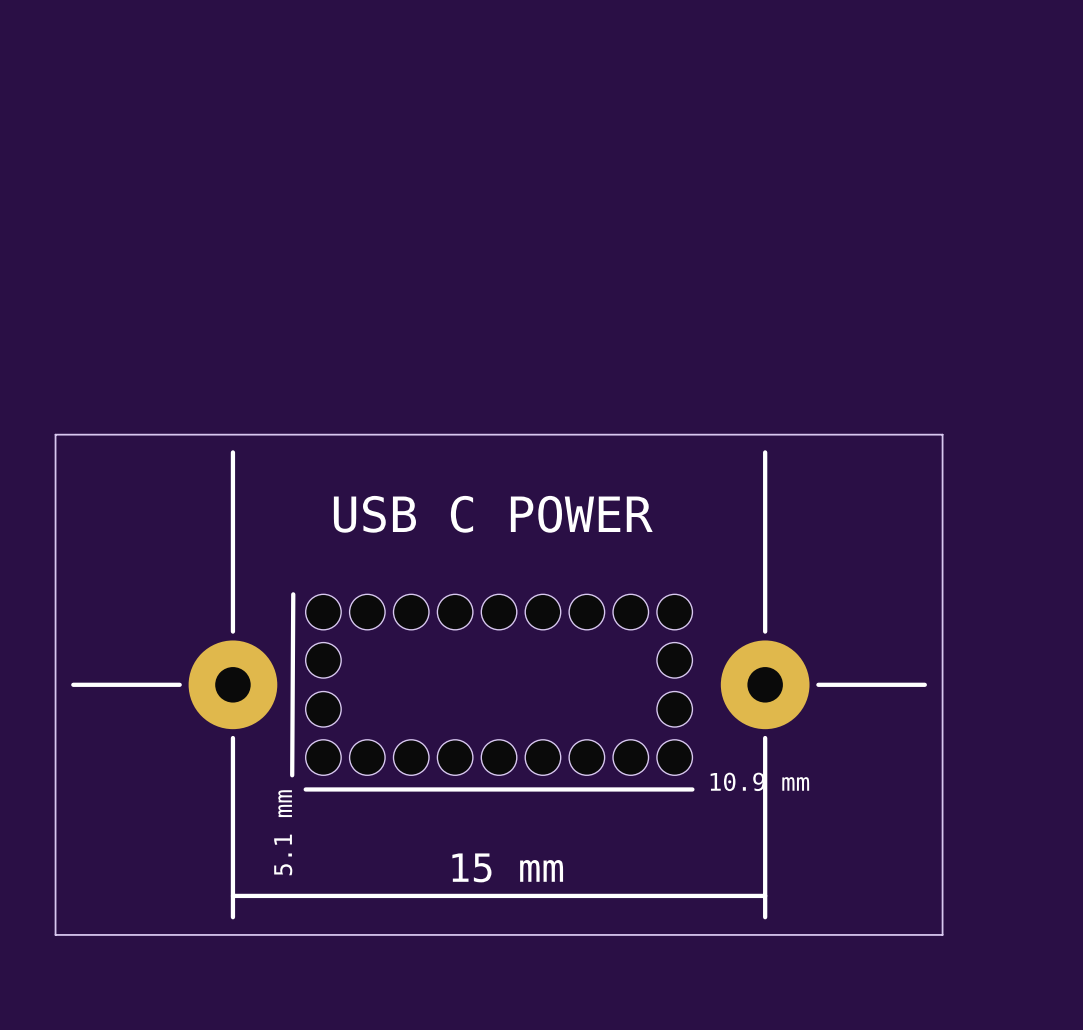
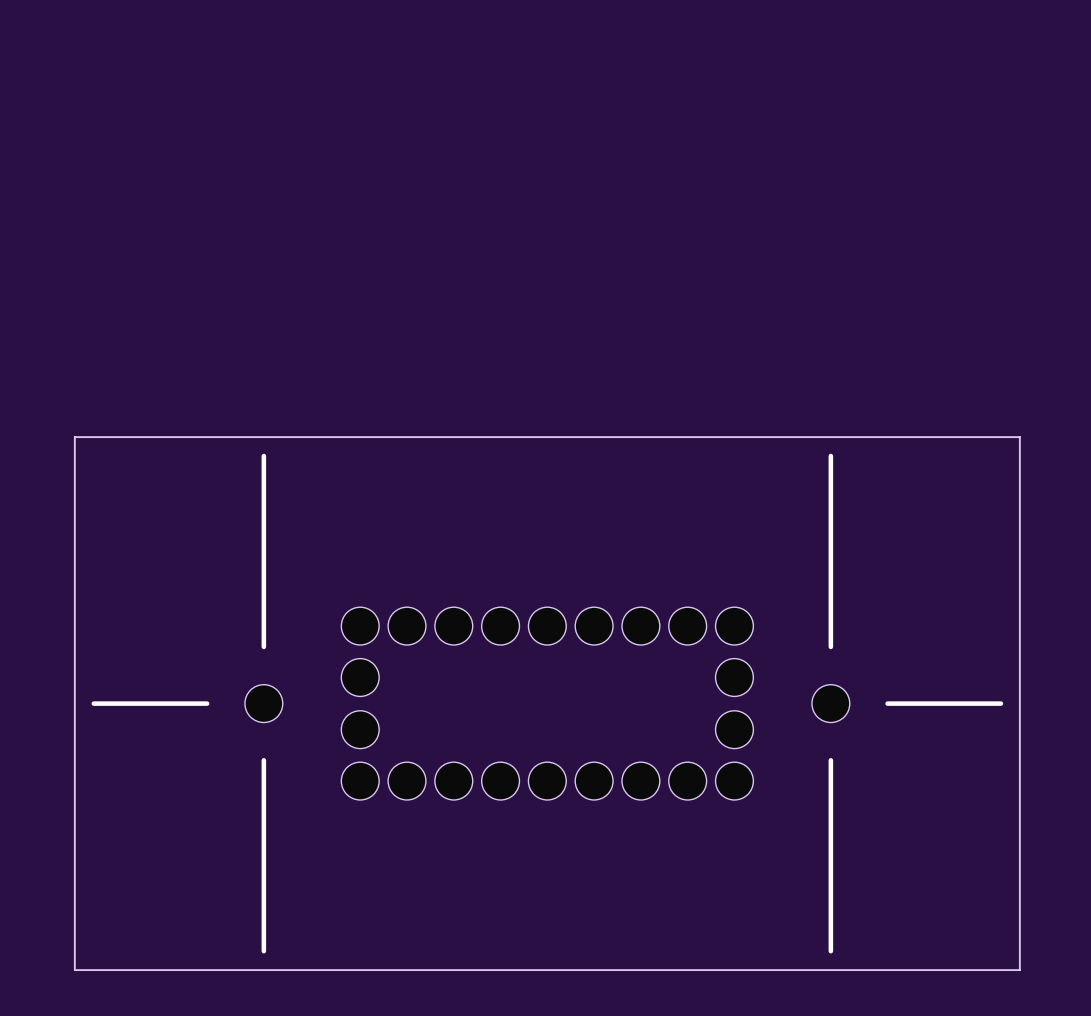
text: USB C POWER (493, 514) -> none
line: (293, 594) (292, 775) -> none
part footprint: [188, 640, 278, 730] -> [244, 684, 283, 723]
part footprint: [720, 640, 810, 730] -> [811, 684, 850, 723]
text: 10.9 mm (759, 781) -> none
line: (305, 789) (692, 789) -> none
text: 5.1 mm (283, 832) -> none
text: 15 mm (507, 867) -> none
line: (232, 895) (765, 895) -> none

